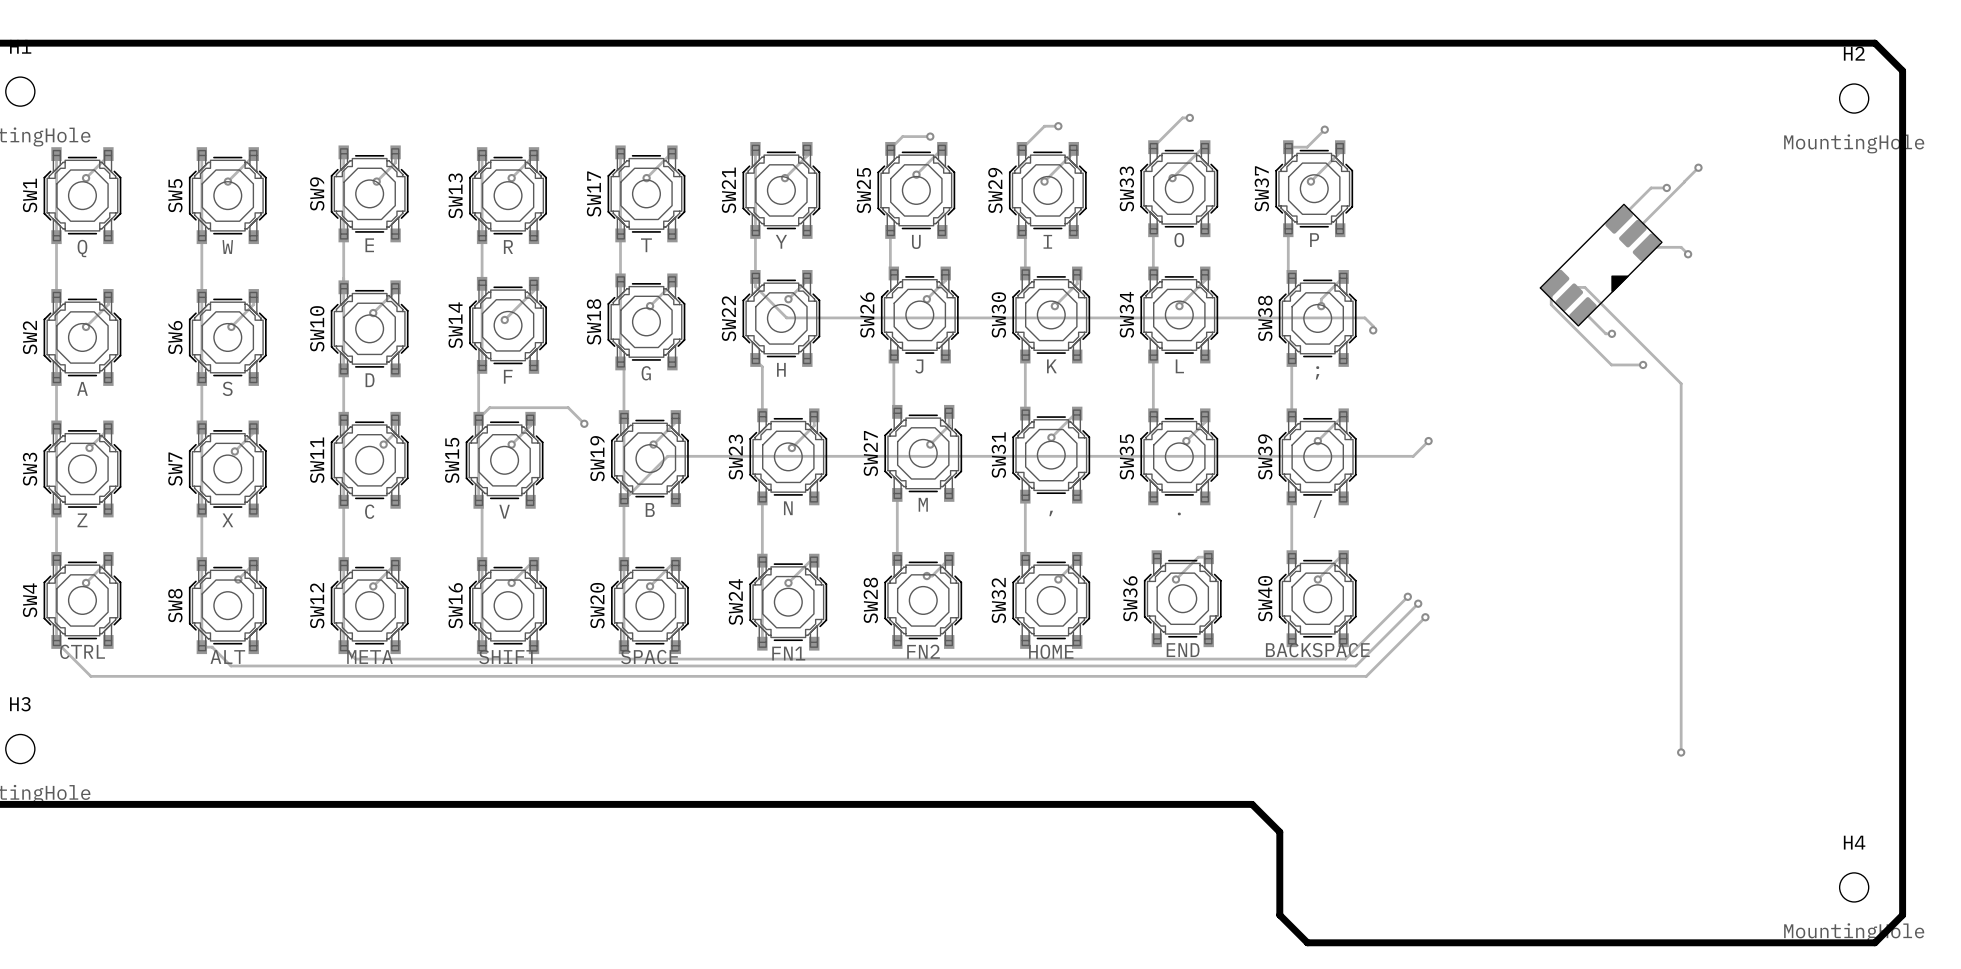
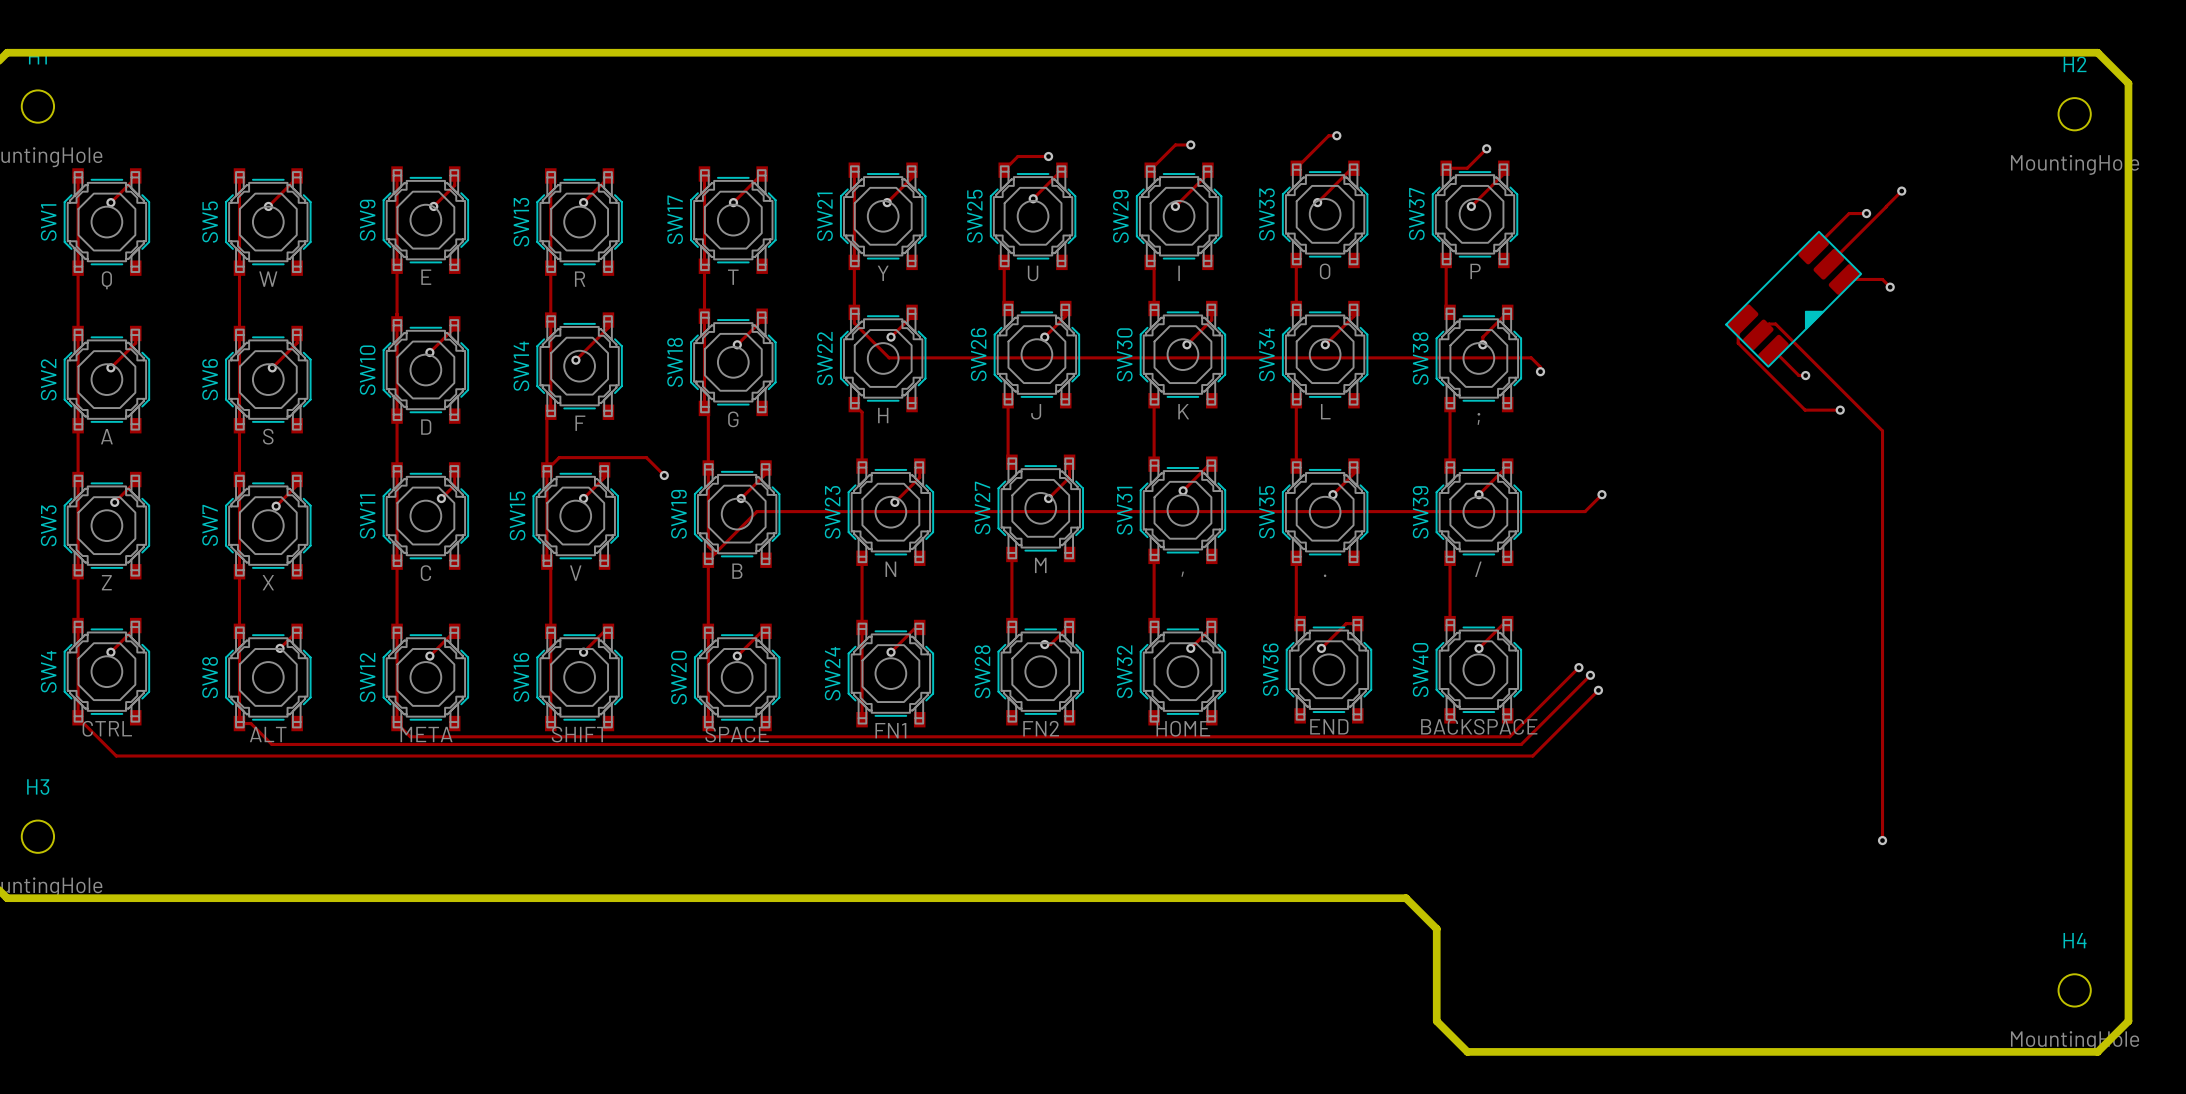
track: none -> (1296, 558) (1296, 619) (1300, 623)

